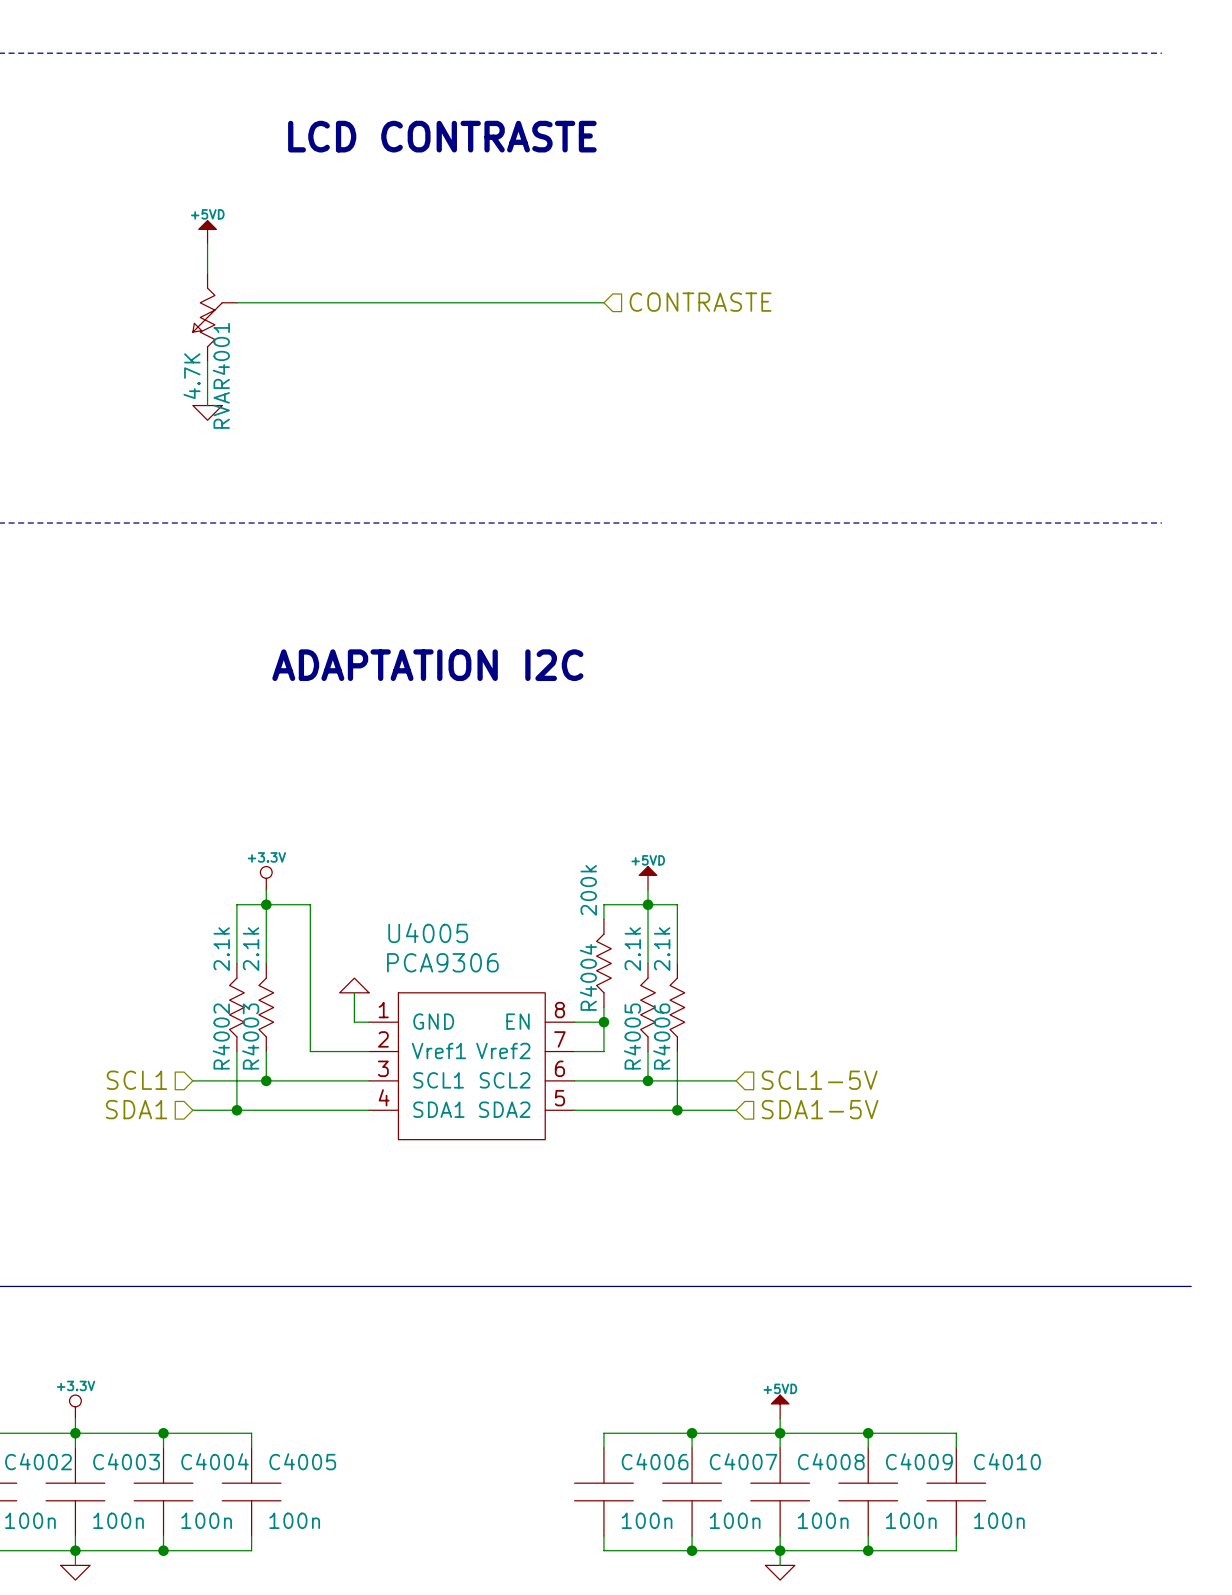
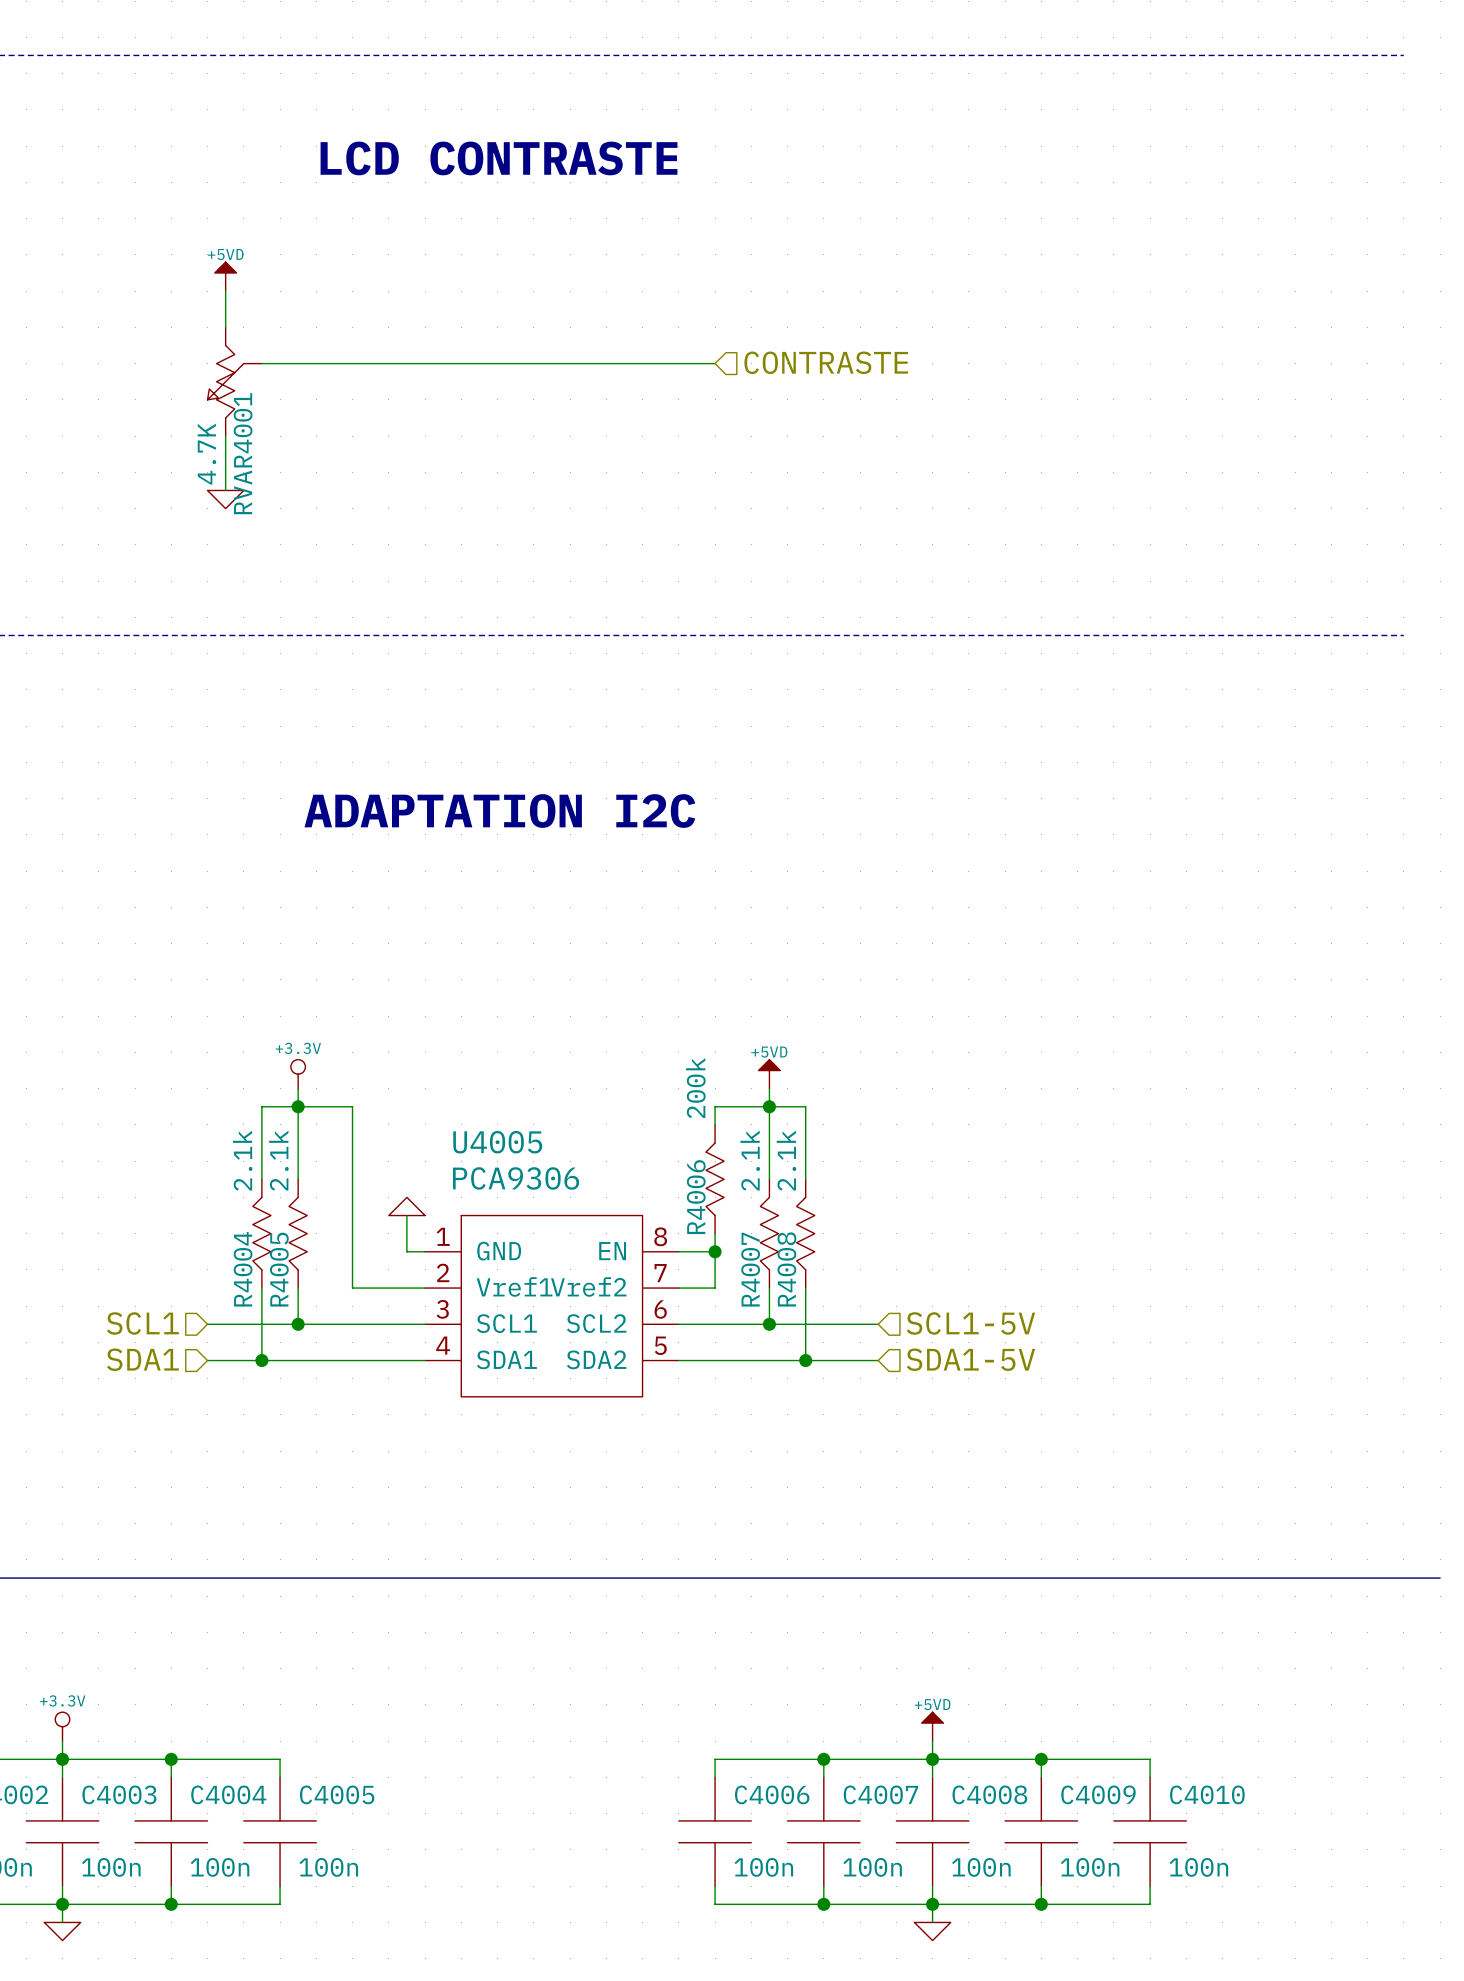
R4004 name: R4004 (588, 977) -> R4006 (696, 1197)
R4002 name: R4002 (221, 1036) -> R4004 (243, 1269)
R4003 name: R4003 (250, 1036) -> R4005 (279, 1269)
R4005 name: R4005 (632, 1036) -> R4007 (750, 1269)
R4006 name: R4006 (661, 1036) -> R4008 (786, 1269)

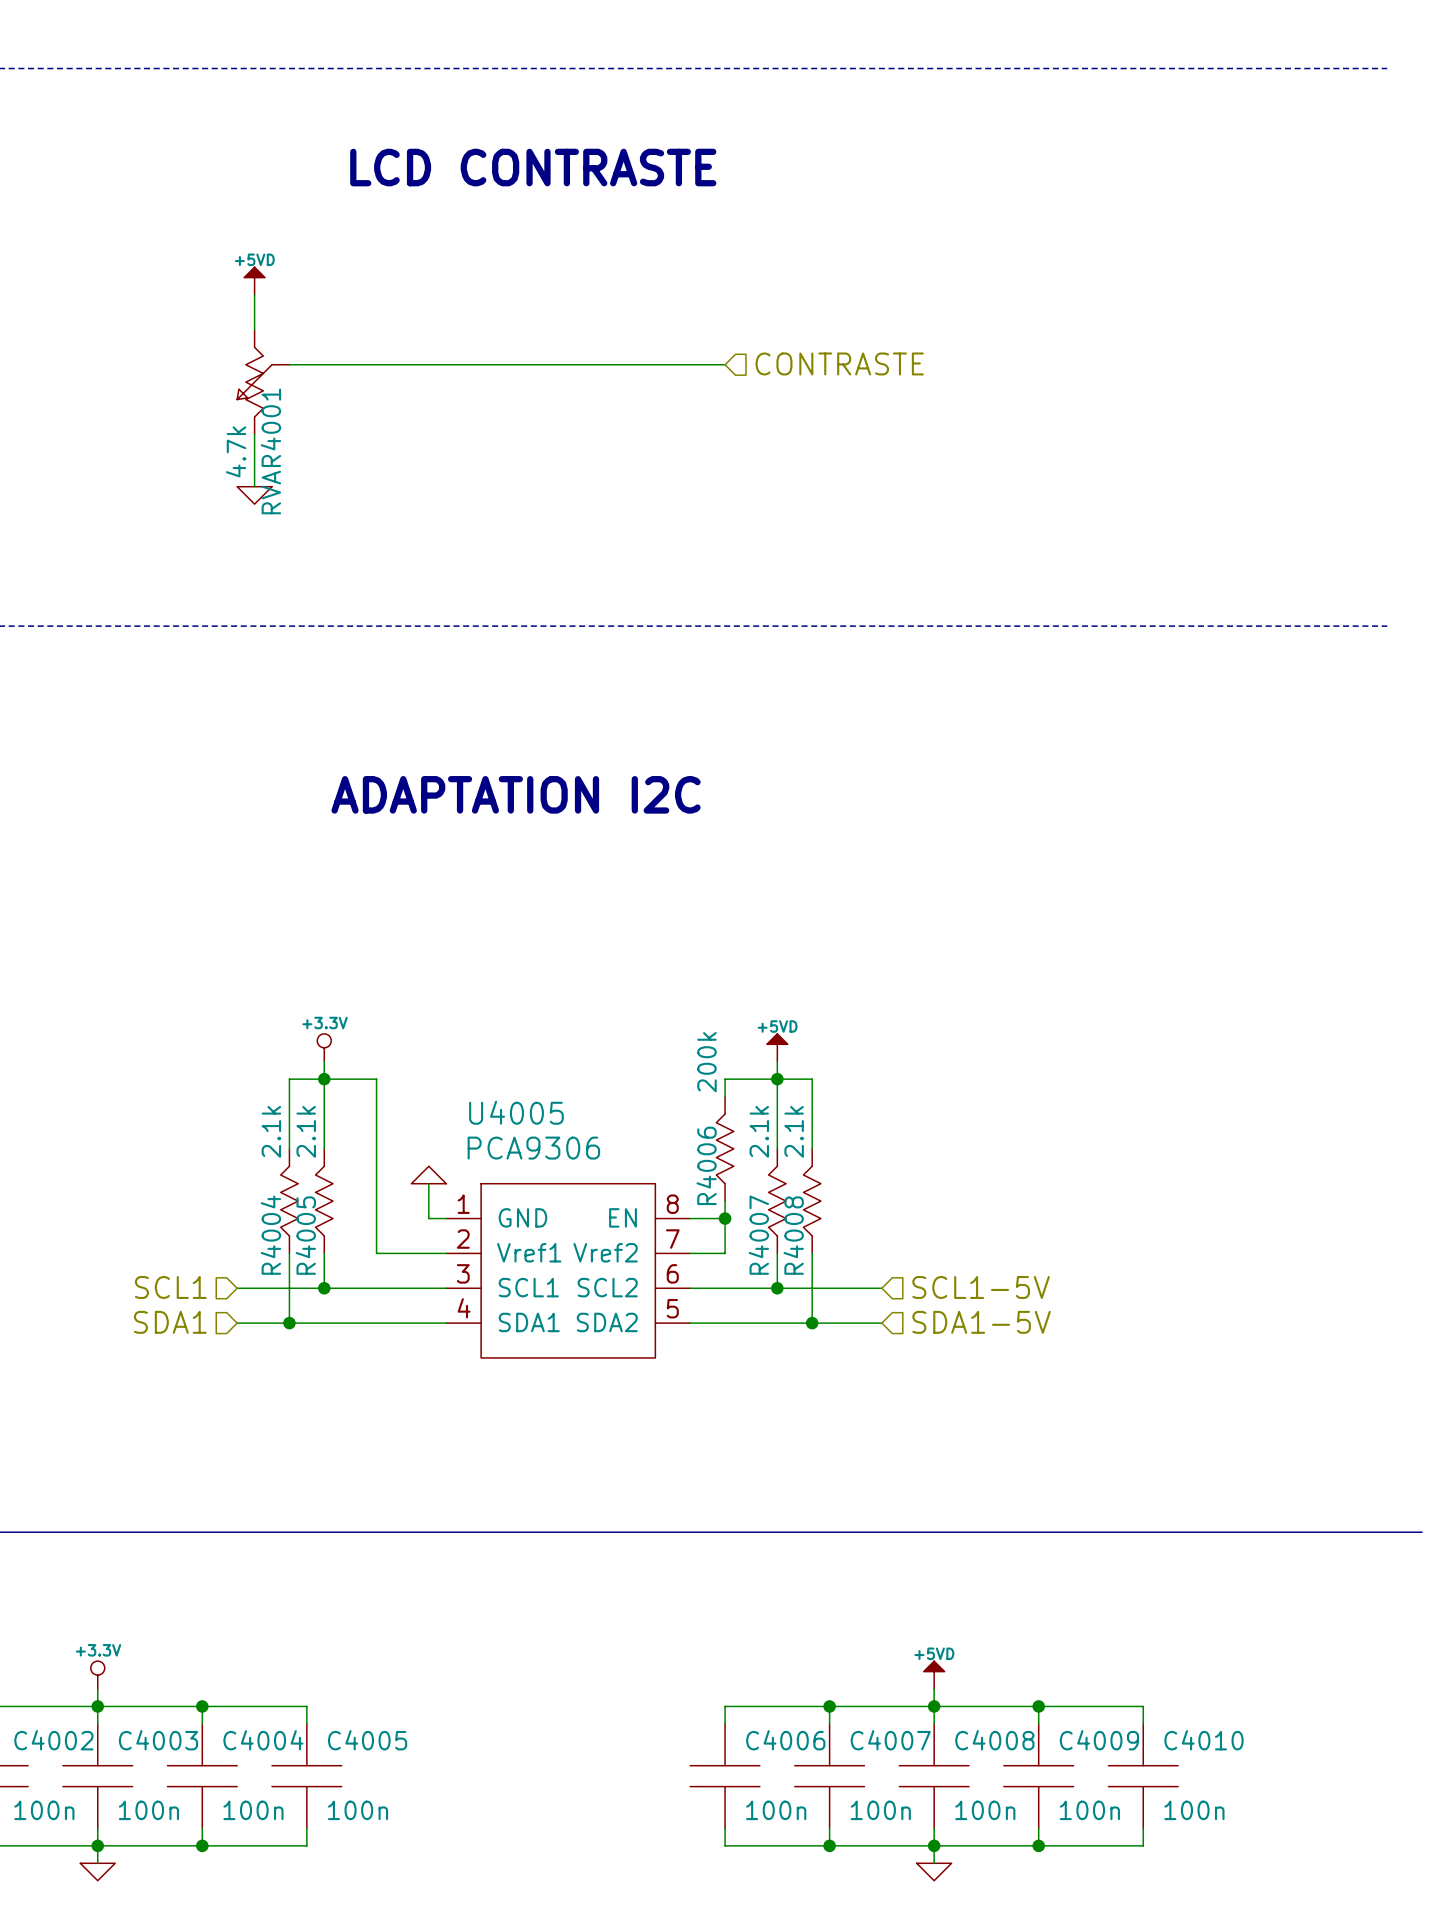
RVAR4001 value: 4.7K (206, 454) -> 4.7k (236, 451)

